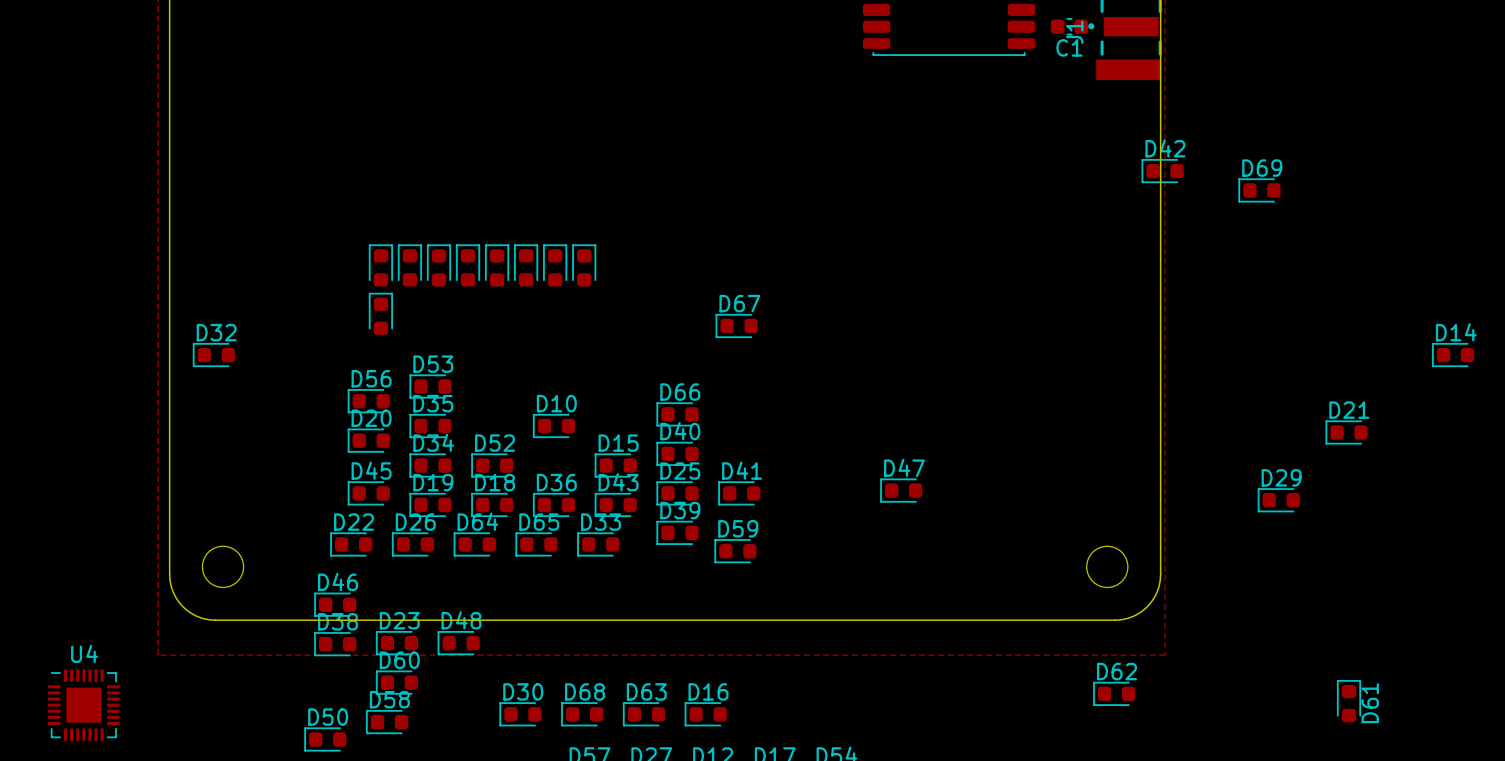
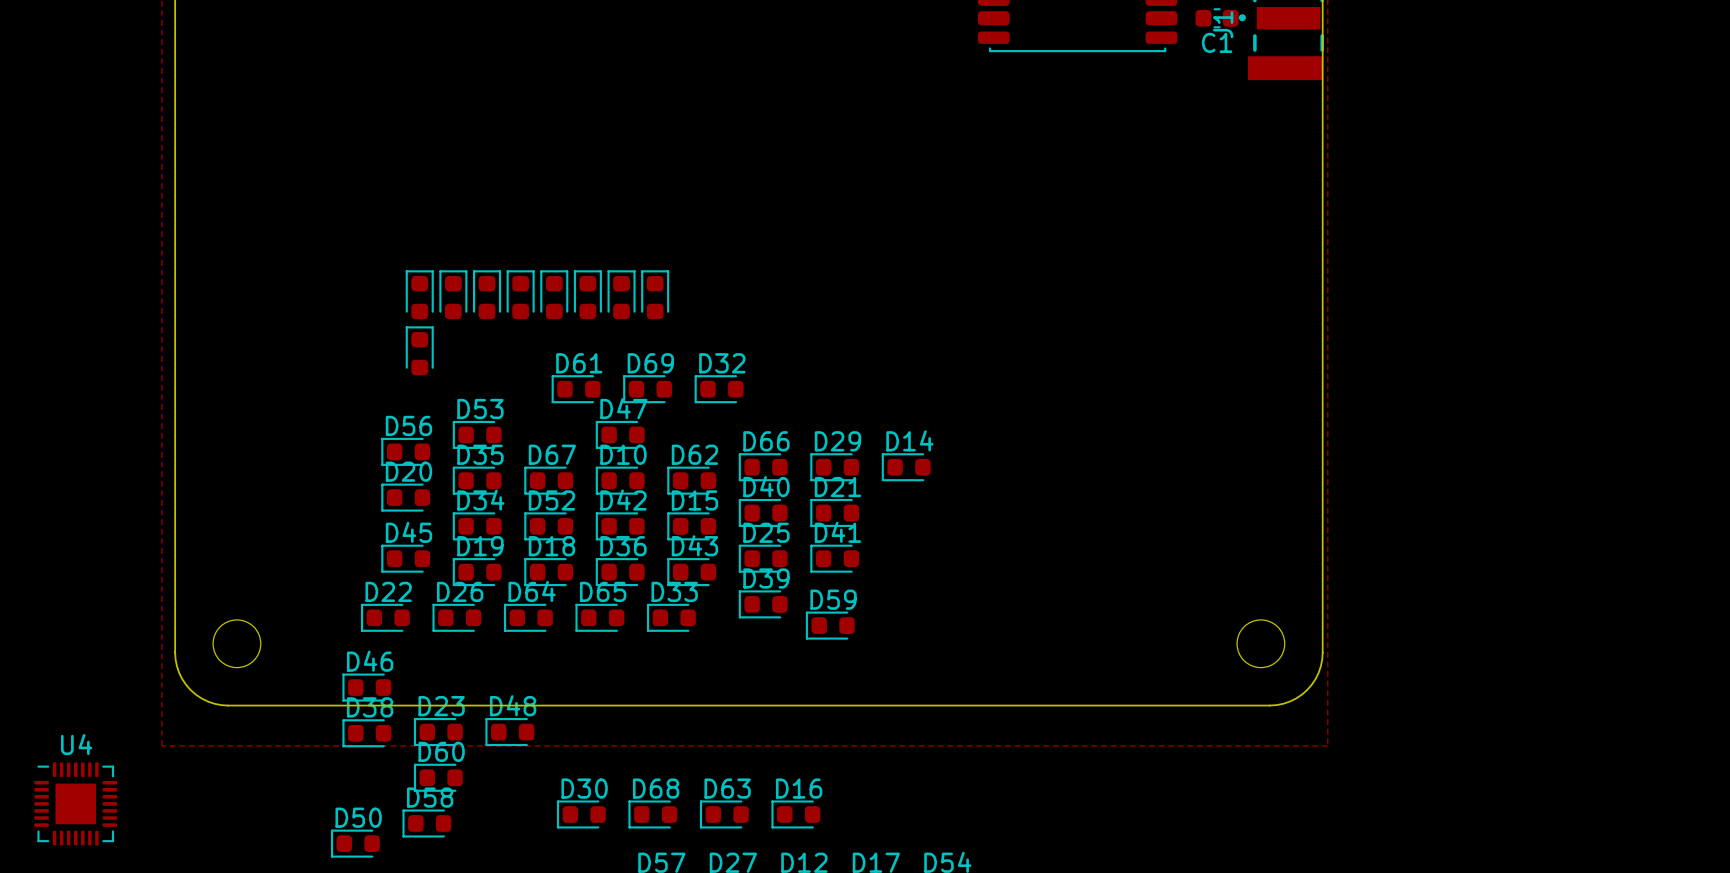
D42 position: (1162, 171) -> (620, 526)
D69 position: (1259, 190) -> (647, 389)
D67 position: (736, 325) -> (548, 480)
D32 position: (213, 355) -> (719, 389)
D14 position: (1453, 355) -> (906, 467)
D21 position: (1346, 432) -> (834, 512)
D47 position: (901, 490) -> (620, 434)
D29 position: (1278, 500) -> (834, 467)
D62 position: (1114, 693) -> (691, 480)
D61 rotation: 0° (1349, 701) -> 90° counterclockwise (576, 389)
D61 position: (1349, 701) -> (576, 389)

